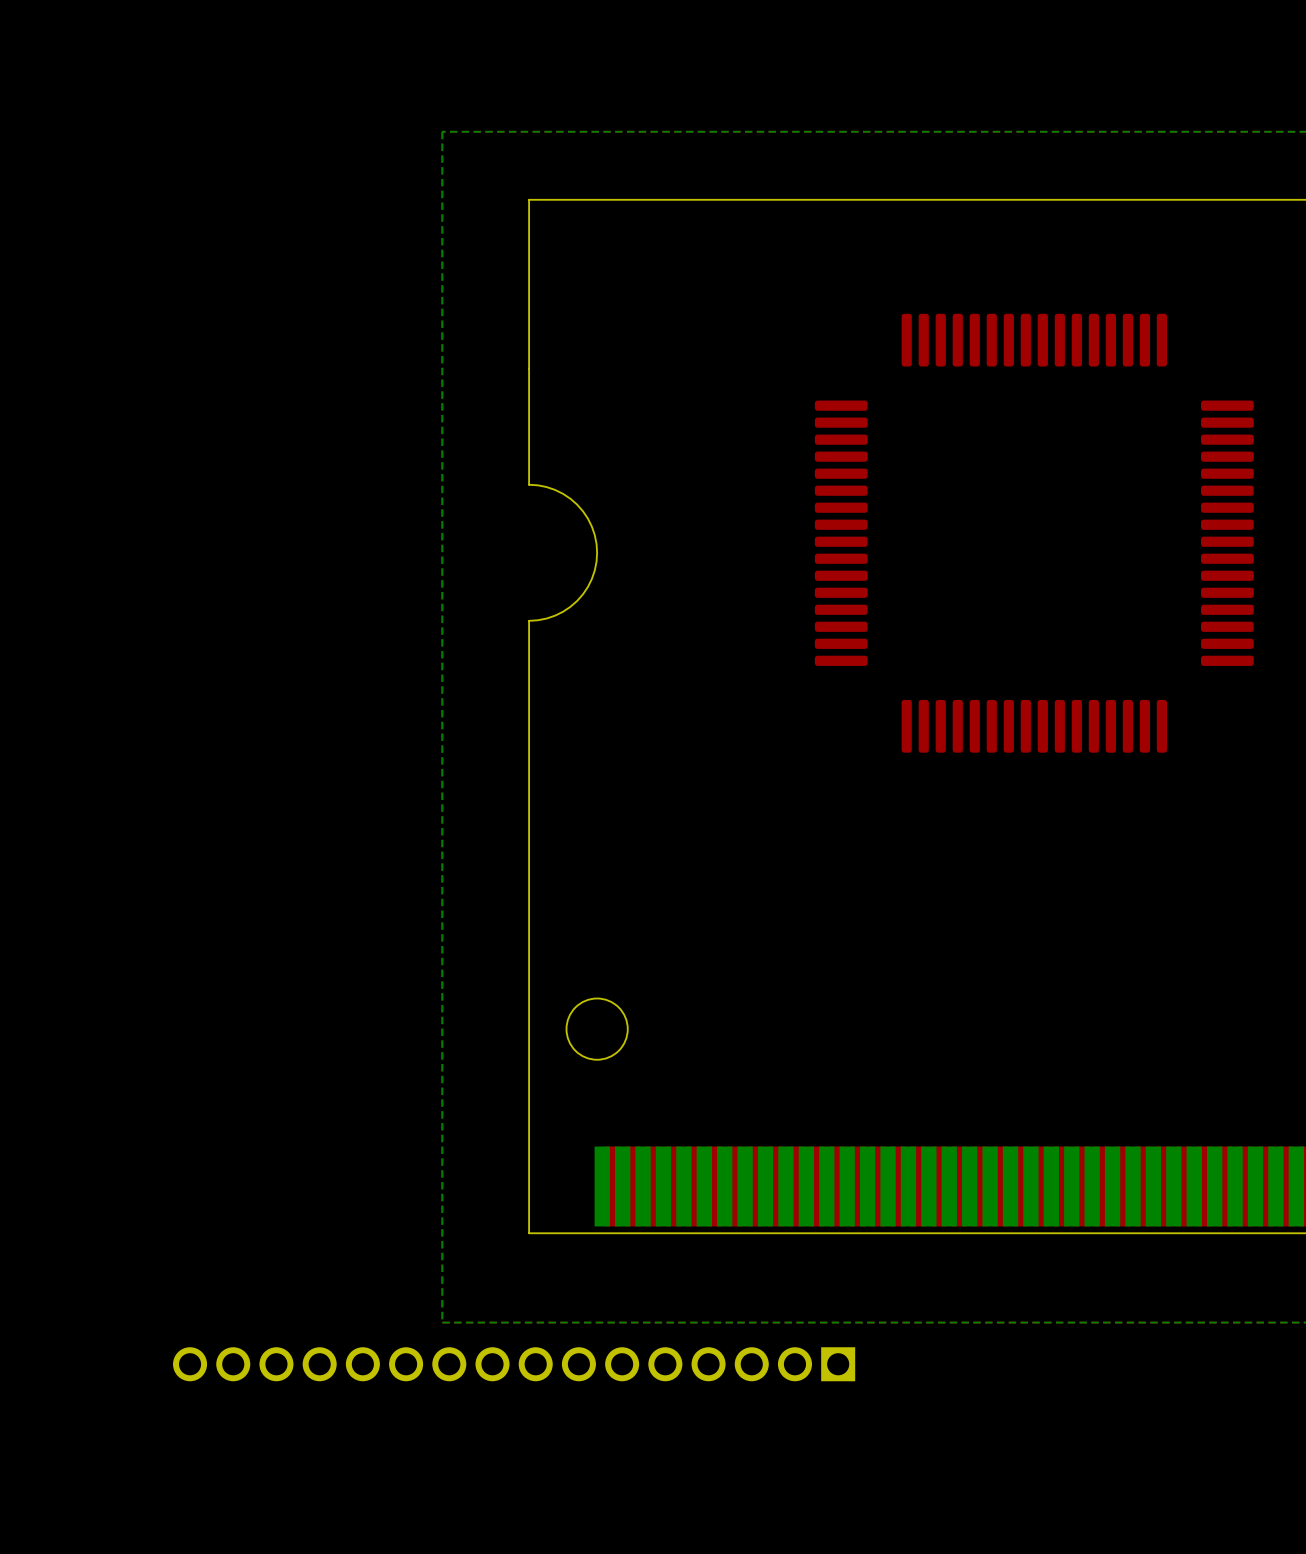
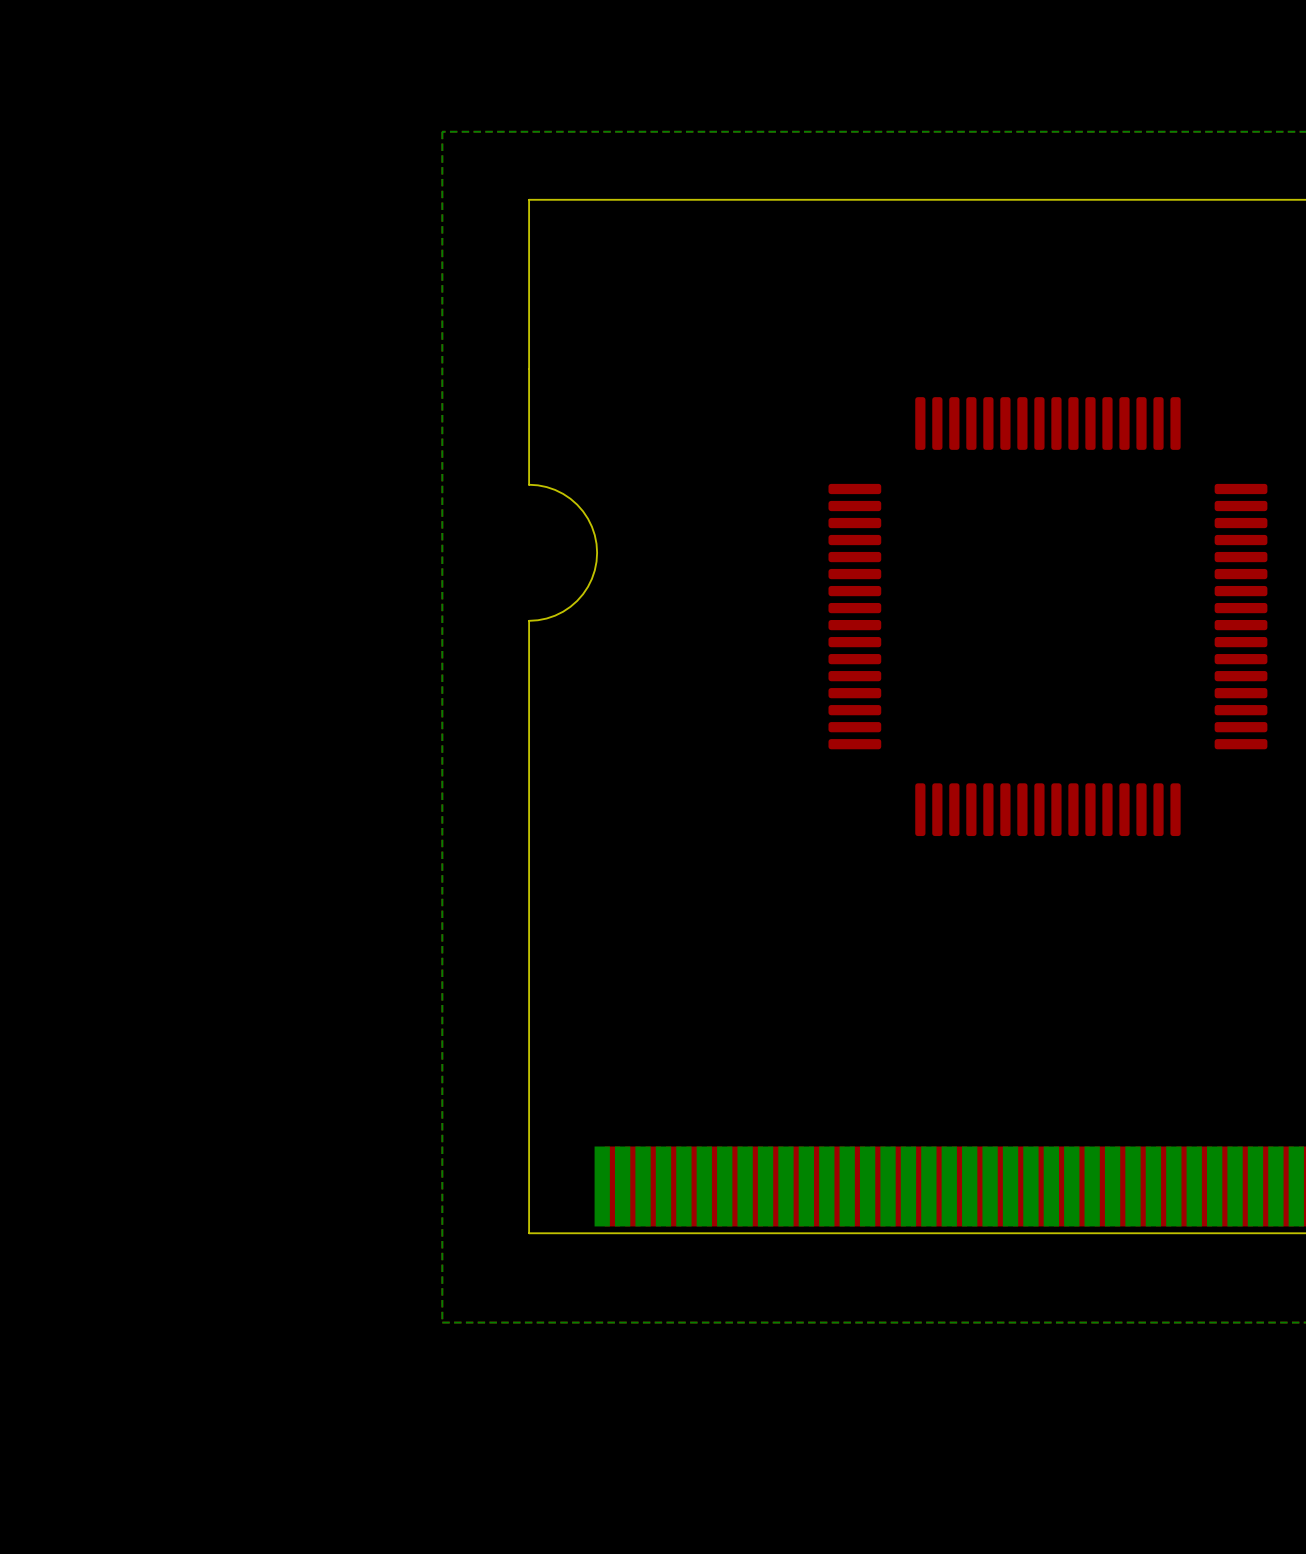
part position: (1034, 533) -> (1047, 616)
round board edge: [565, 997, 629, 1061] -> none
part: (514, 1364) -> none

